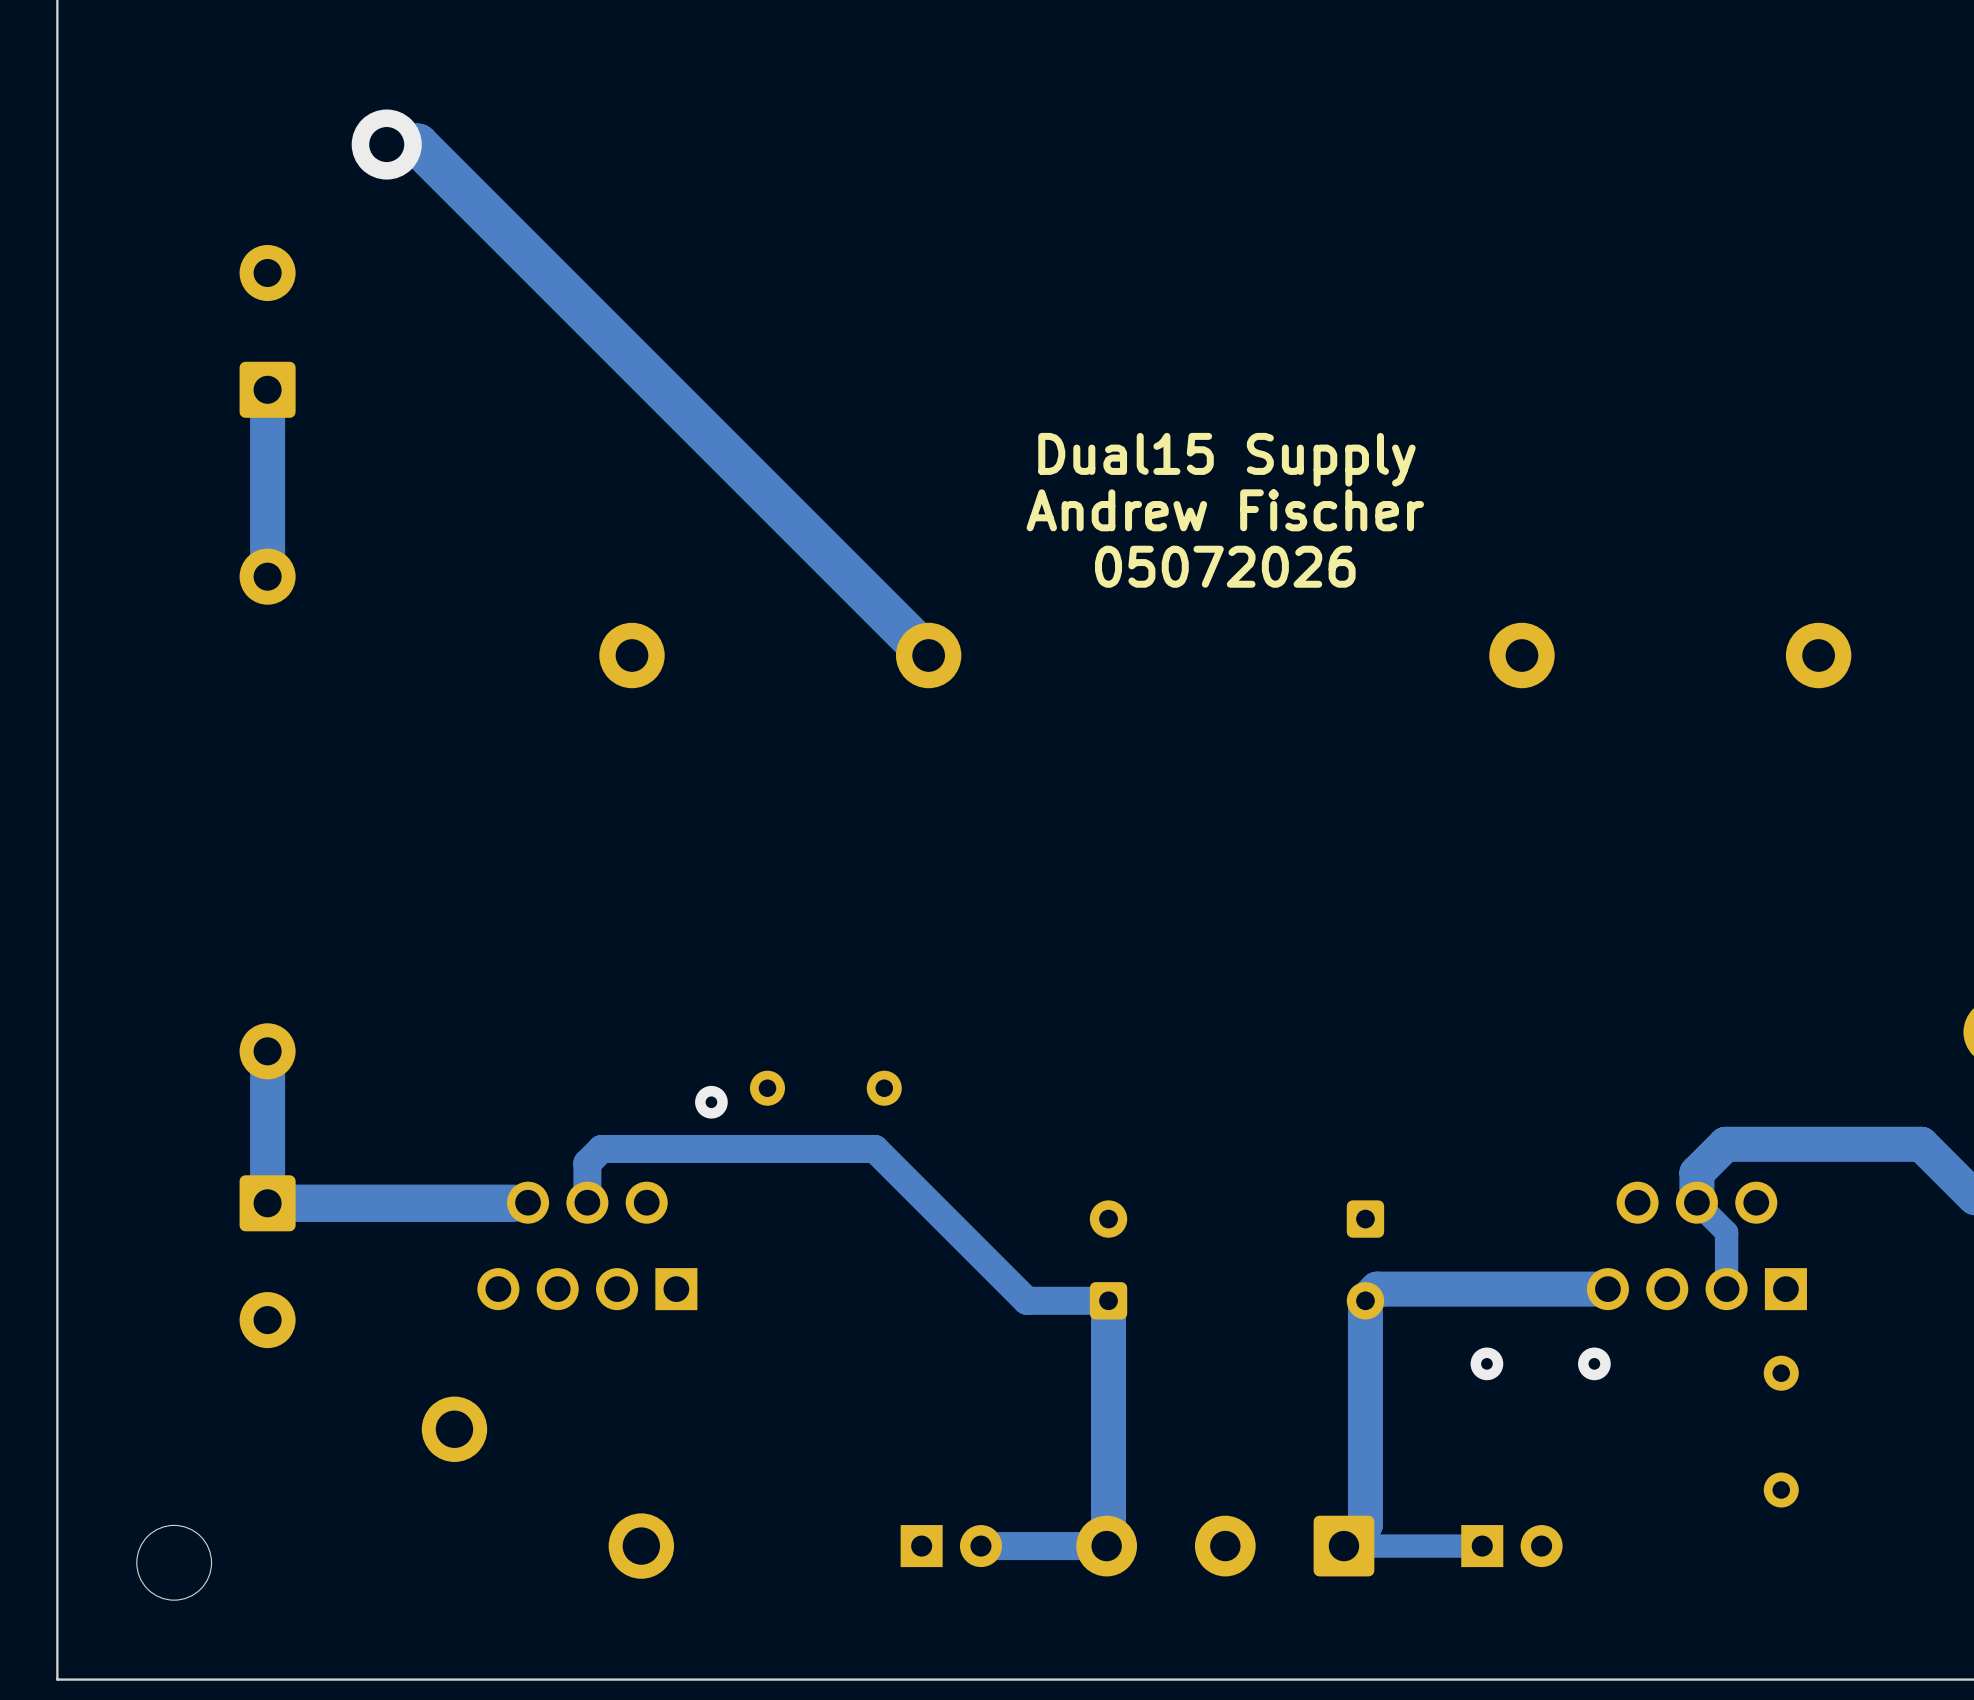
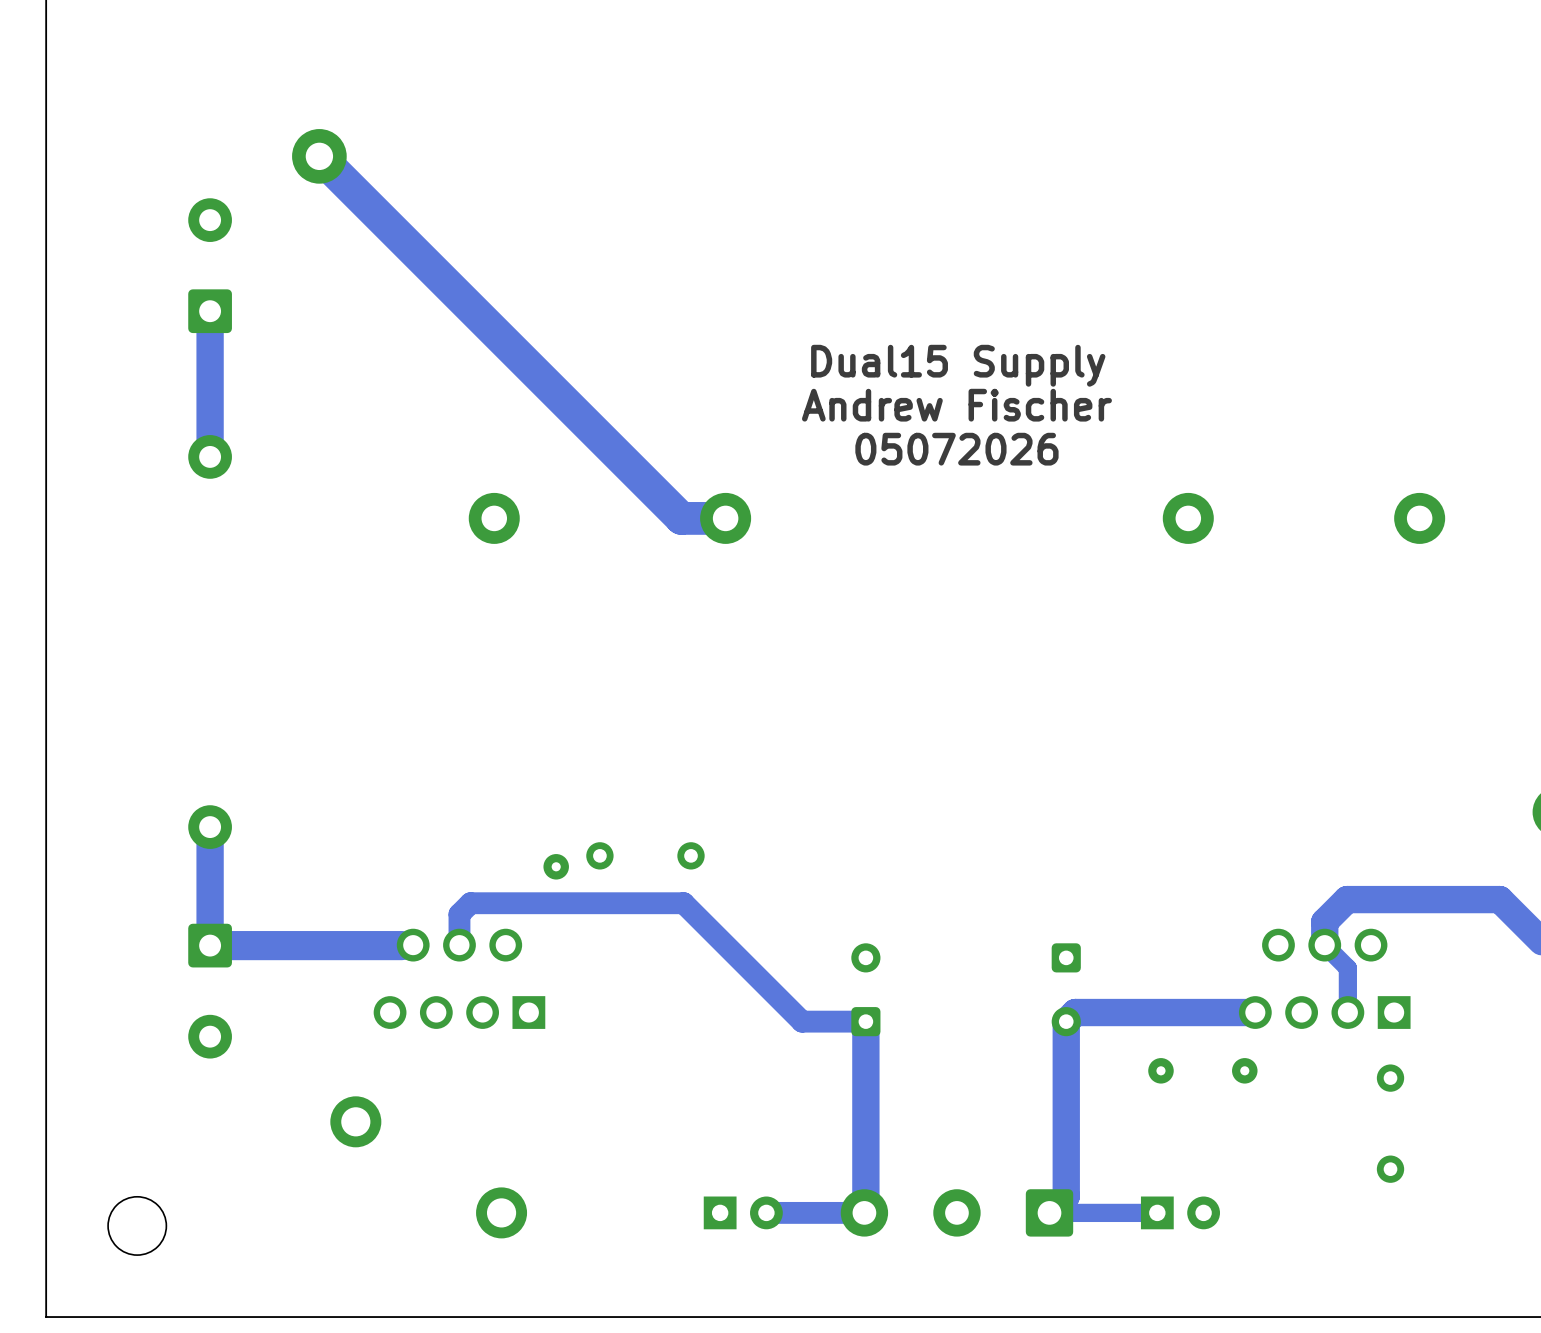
track: (386, 144) (417, 144) (928, 655) -> (319, 156) (681, 518) (725, 518)
via position: (386, 144) -> (319, 156)

